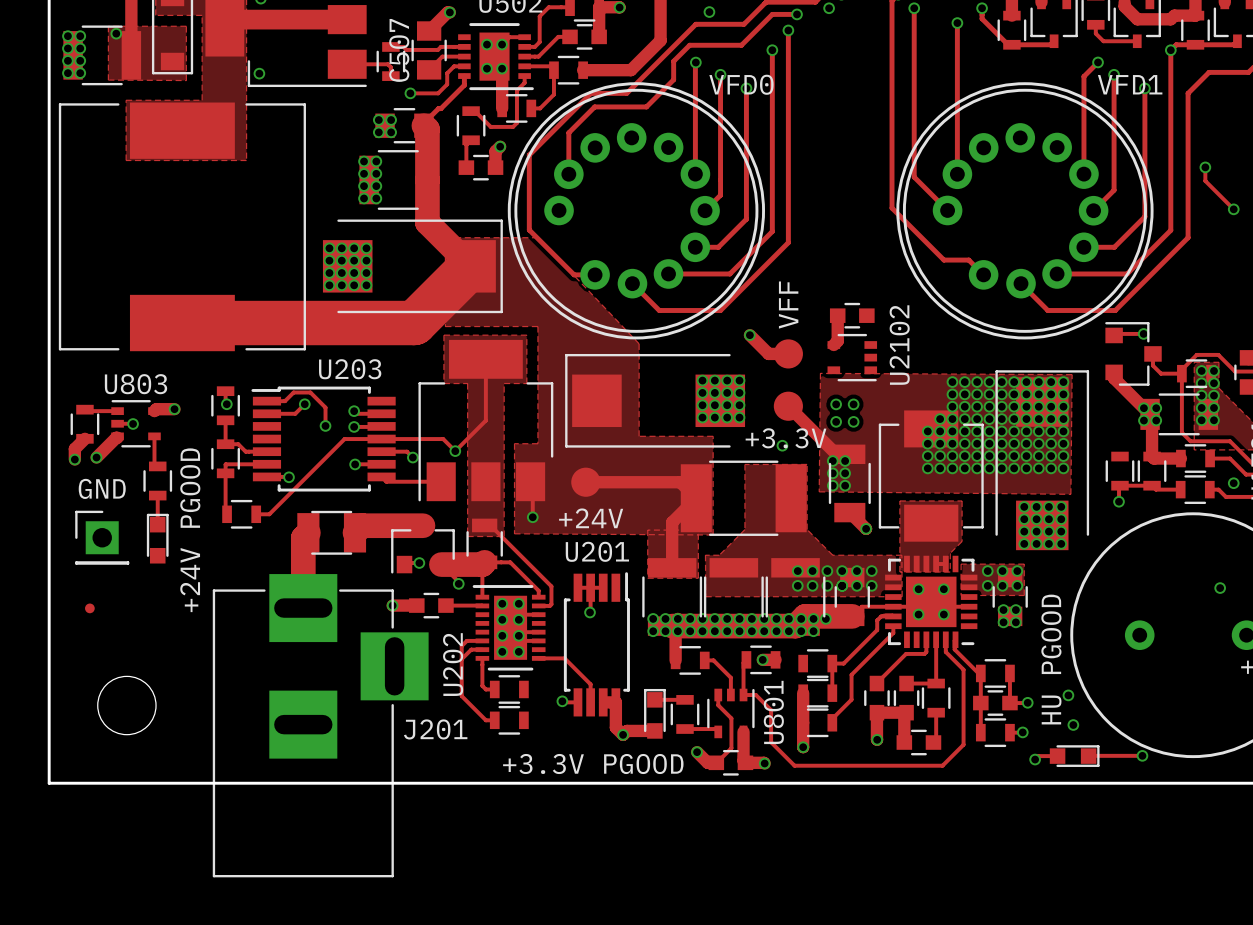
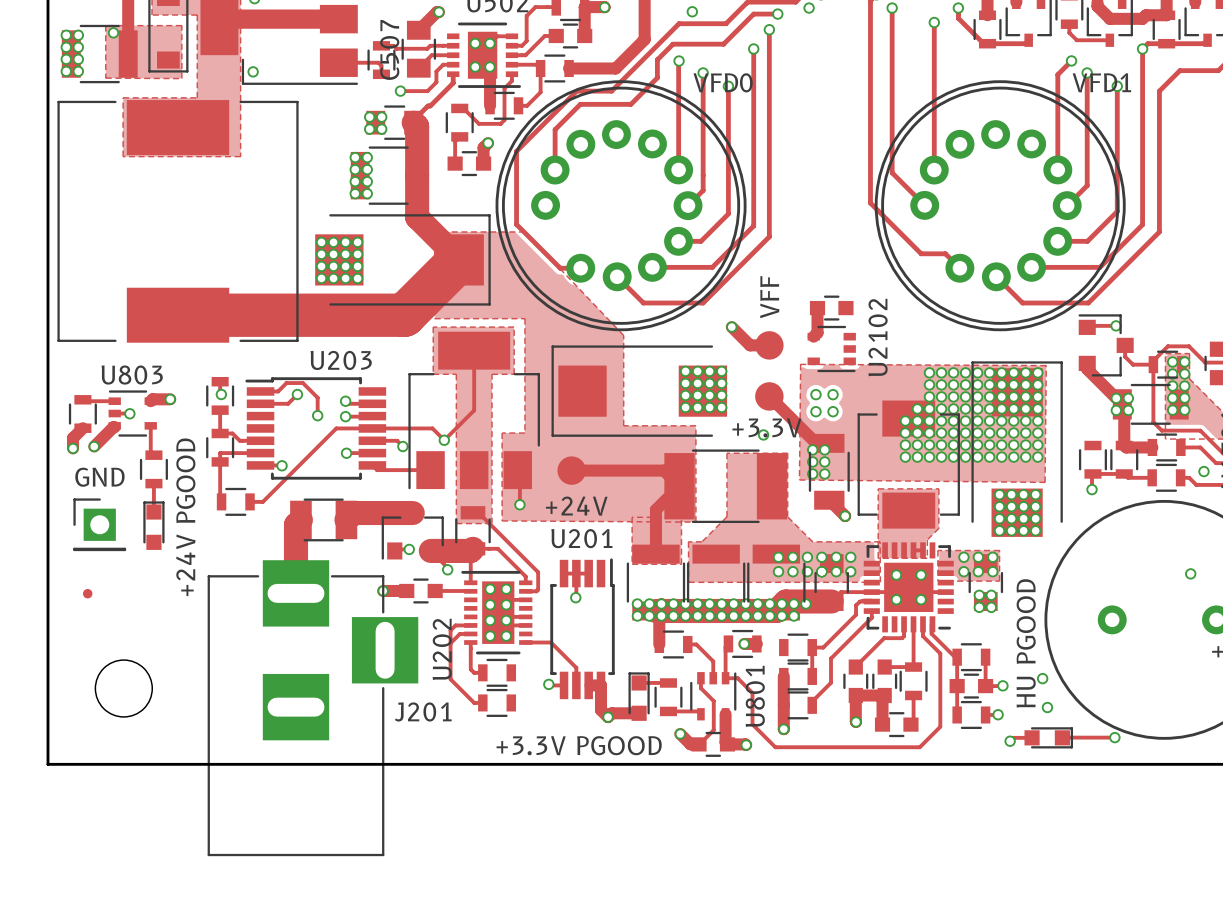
track: (1205, 167) (1205, 180) (1233, 209) -> none
via: (1205, 167) -> none
via: (1233, 209) -> none

